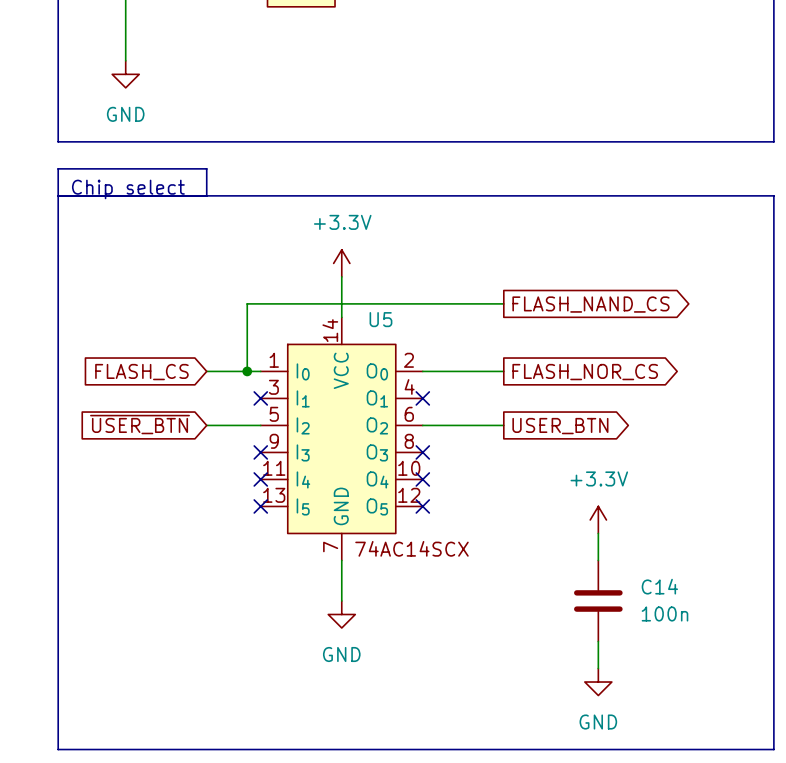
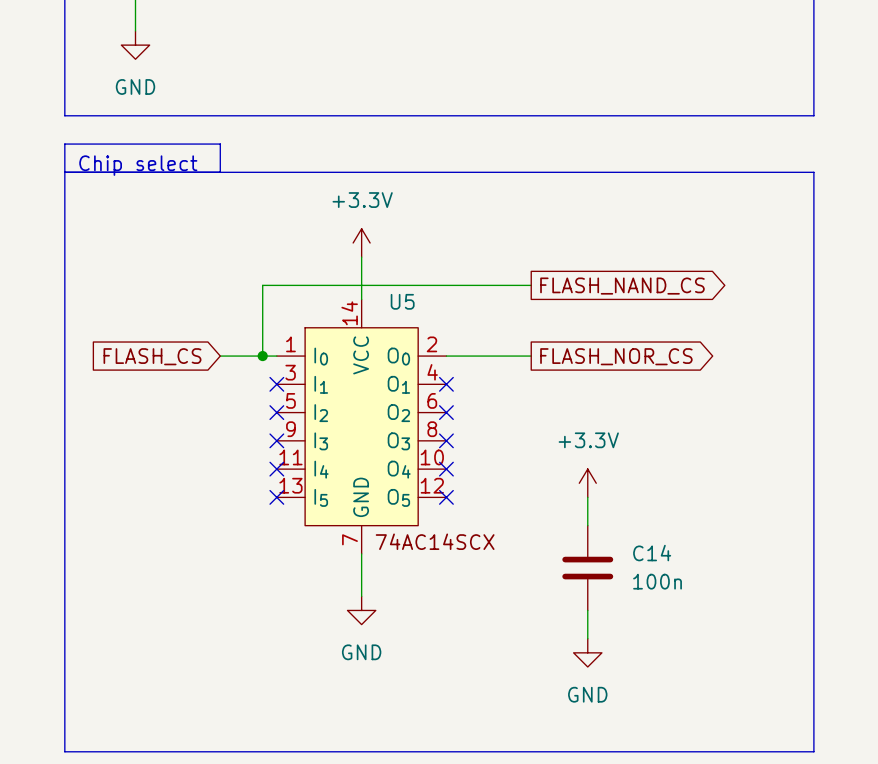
global label: ~{USER_BTN} (140, 424) -> none
wire: (206, 425) (260, 425) -> none
no-connect mark: none -> (276, 412)
wire: (422, 425) (503, 425) -> none
no-connect mark: none -> (446, 412)
global label: USER_BTN (560, 426) -> none
power symbol position: +3.3V (598, 519) -> +3.3V (587, 483)
wire: (598, 533) (598, 560) -> (587, 497) (587, 525)
C14 position: (598, 600) -> (587, 568)
wire: (598, 641) (598, 668) -> (587, 610) (587, 638)
power symbol position: GND (598, 682) -> GND (587, 652)

